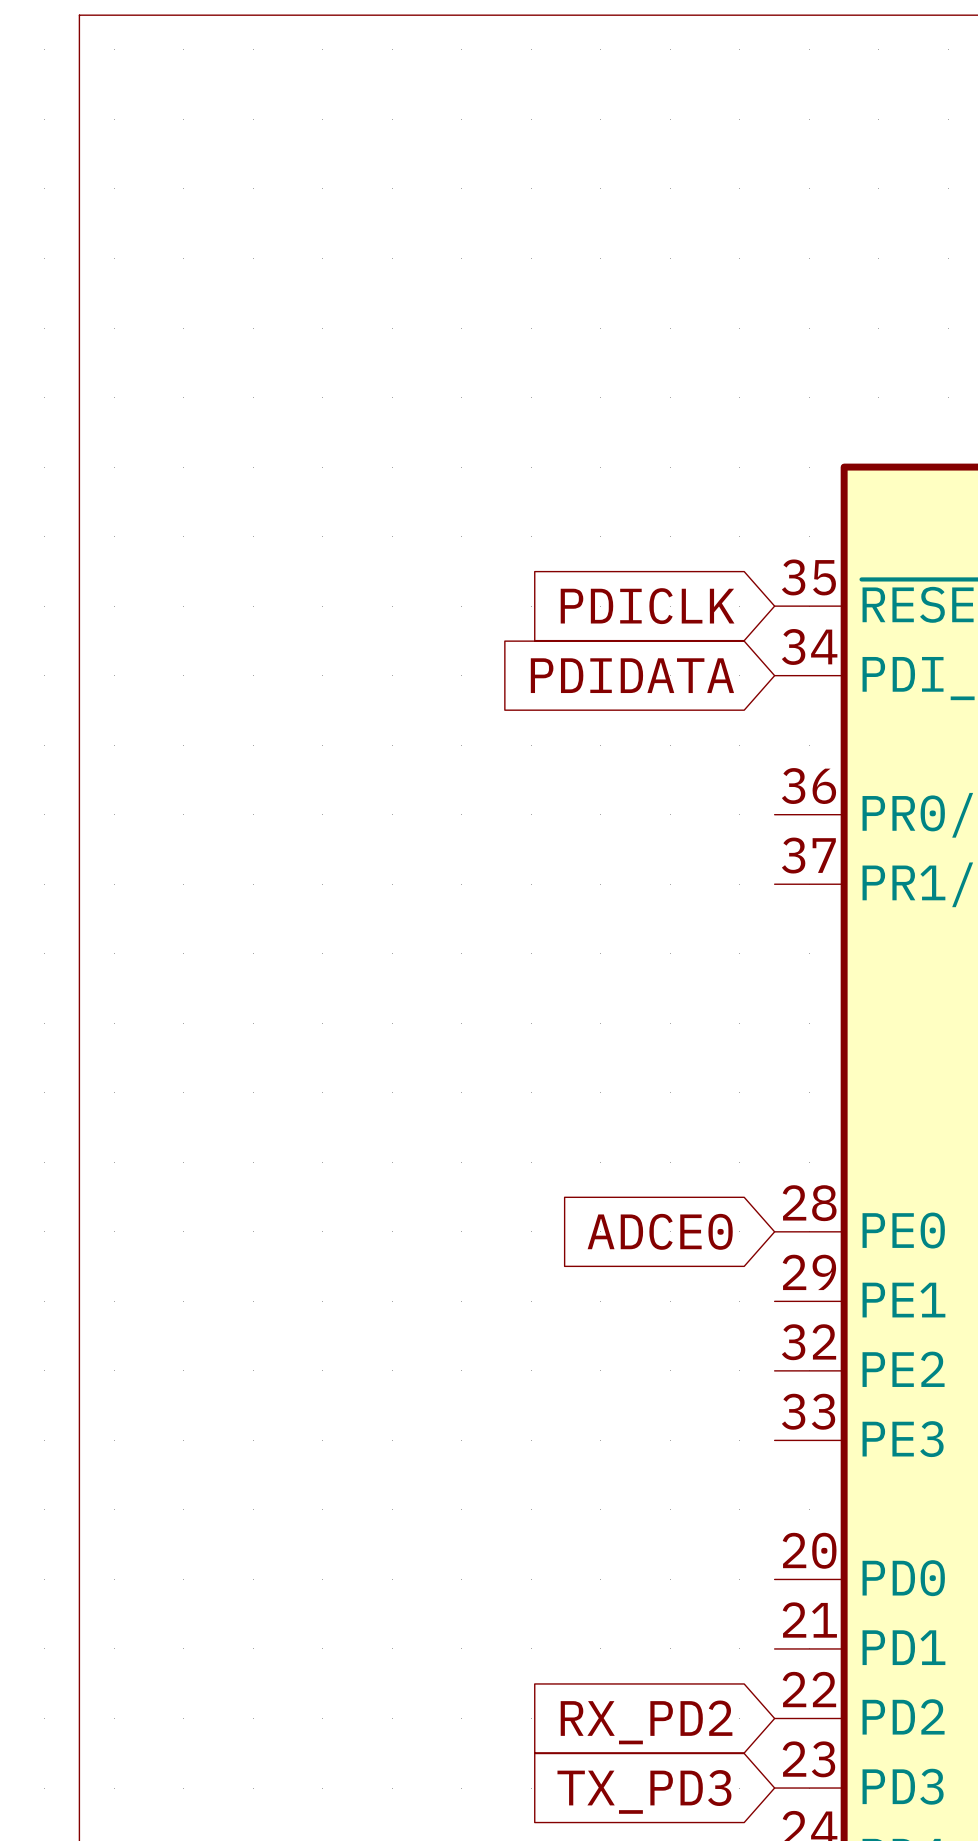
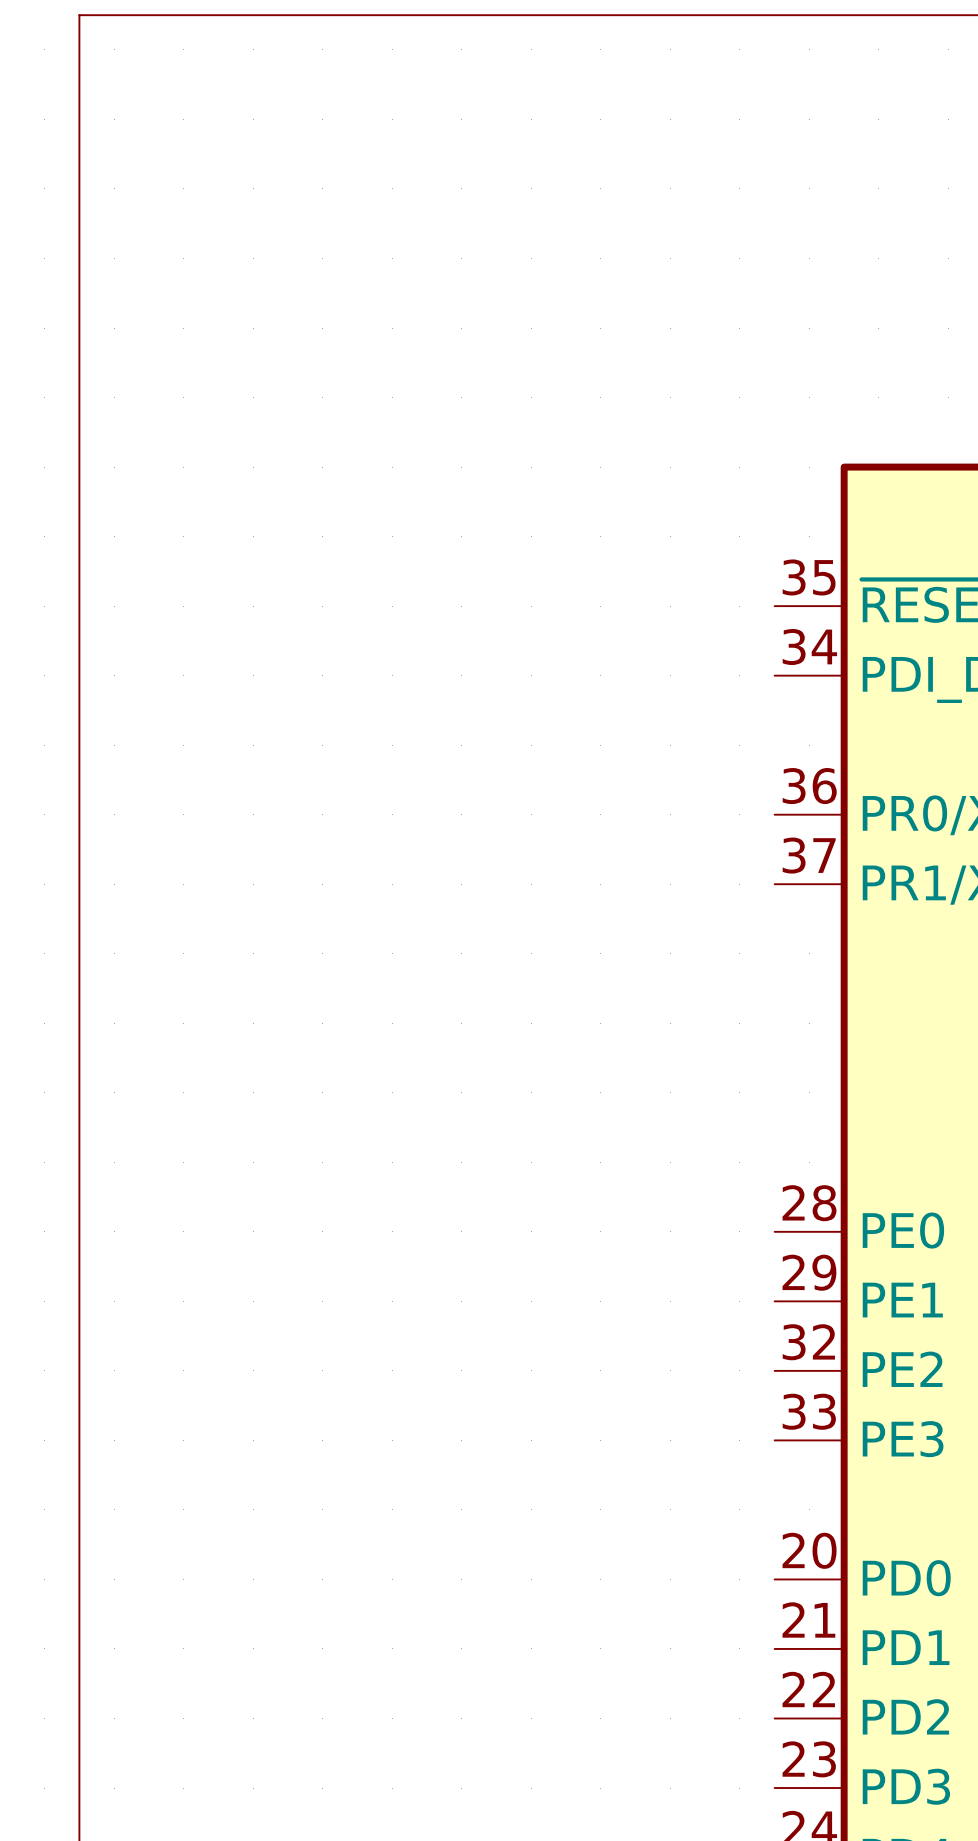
global label: PDICLK (647, 606) -> none
global label: PDIDATA (632, 675) -> none
global label: ADCE0 (660, 1231) -> none
global label: RX_PD2 (646, 1722) -> none
global label: TX_PD3 (644, 1791) -> none

